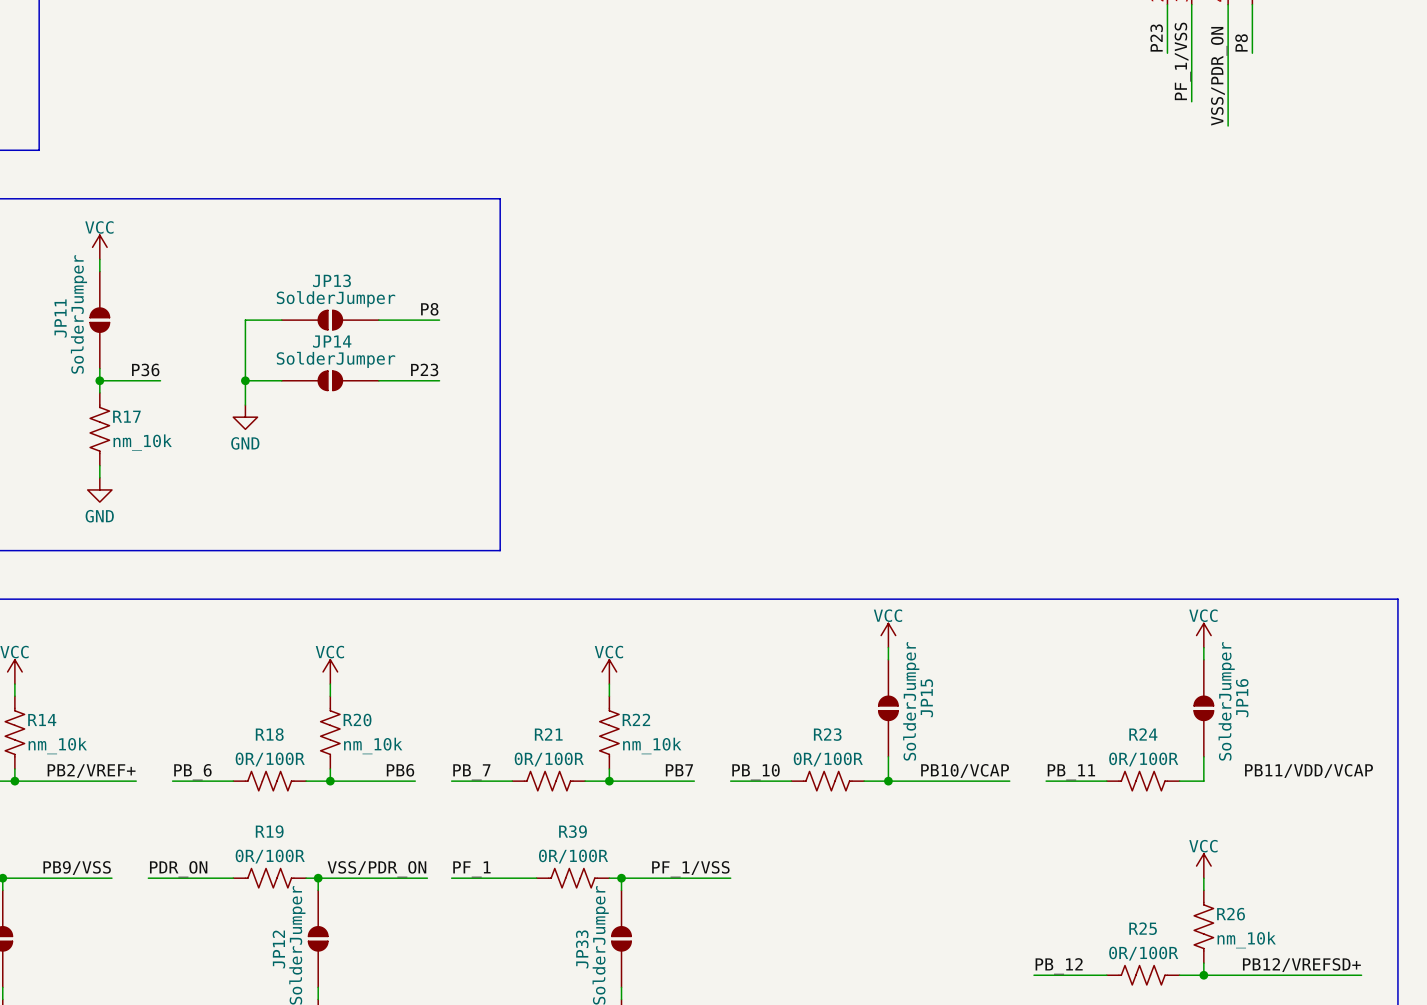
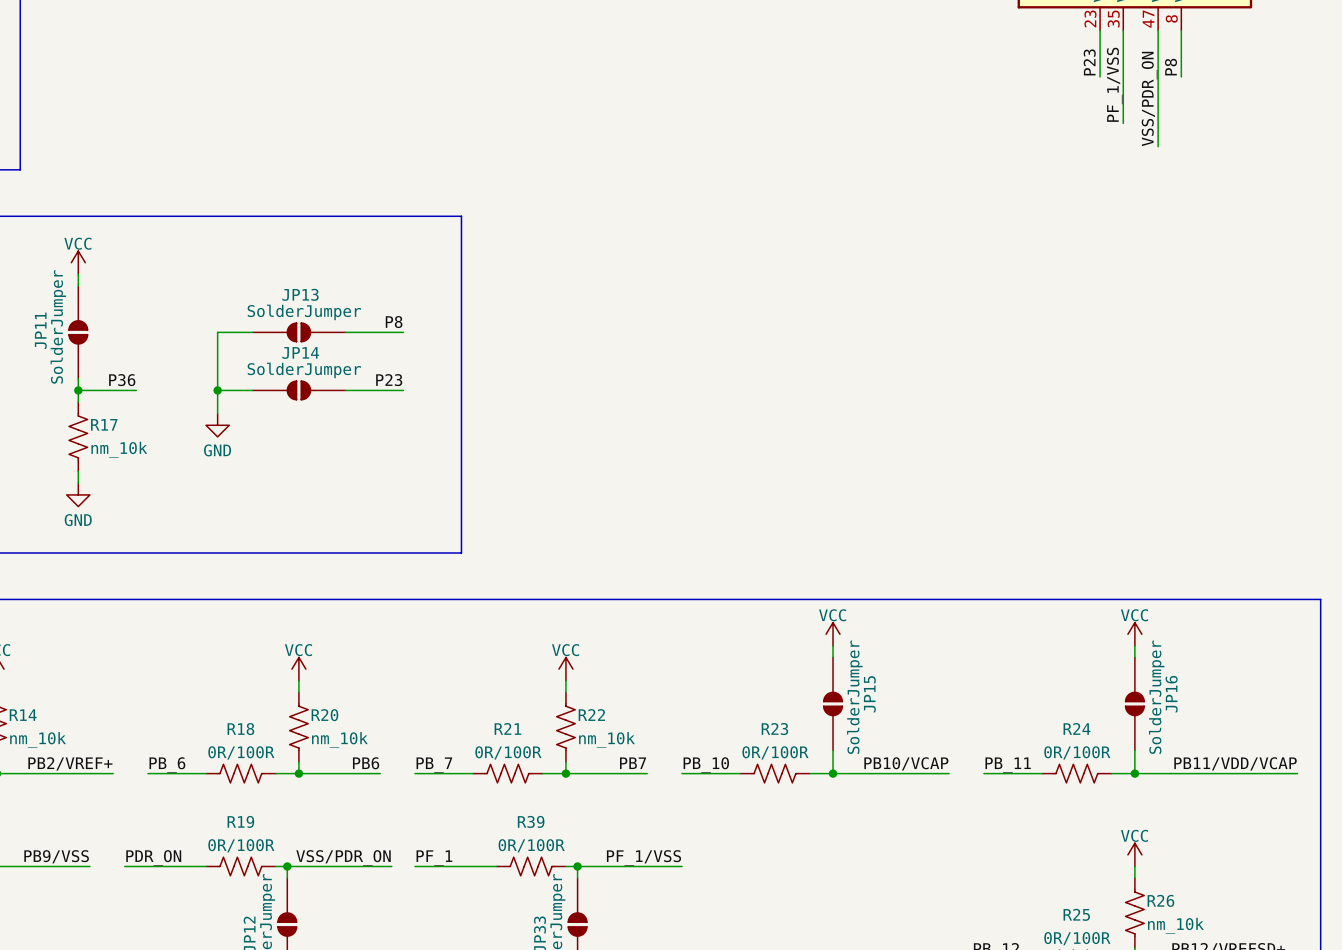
wire: none -> (1134, 773) (1297, 773)
junction: none -> (1134, 773)

